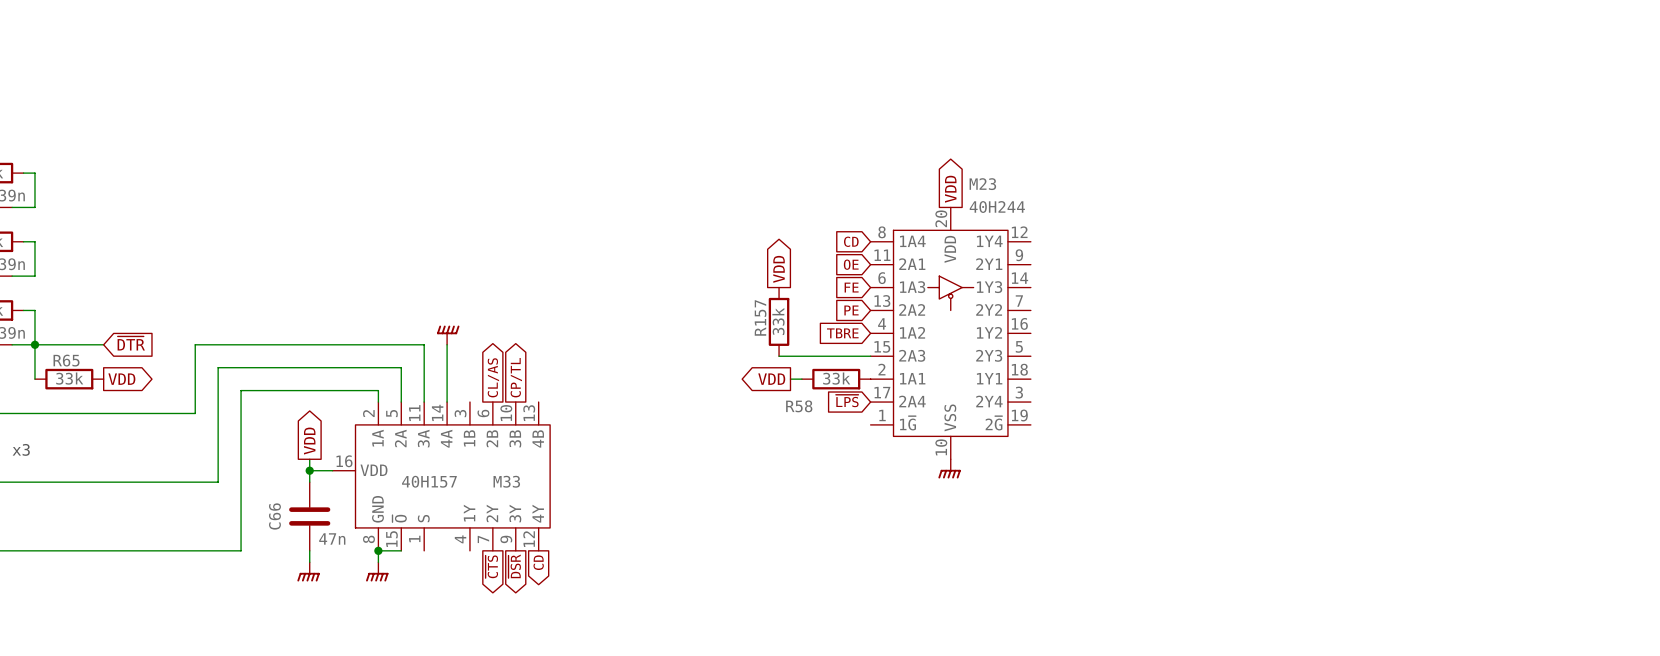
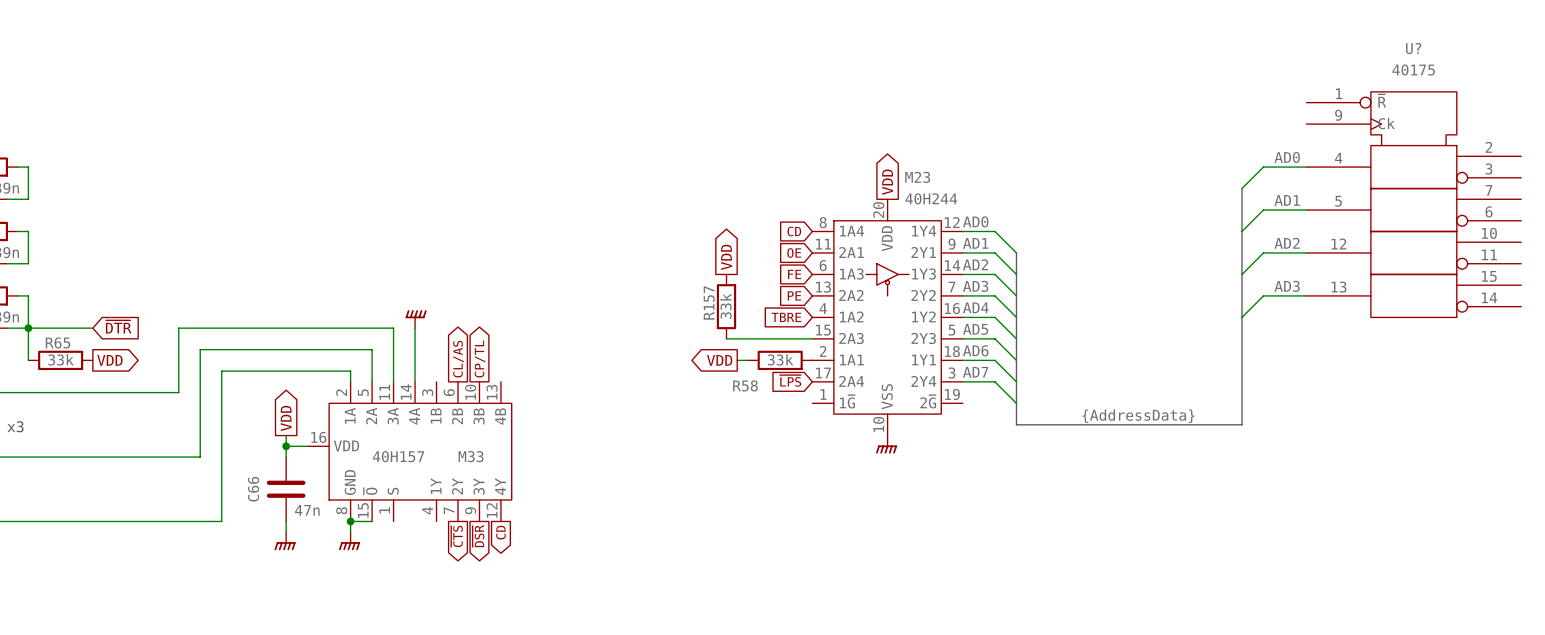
label: none -> AD0 (1287, 157)
wire: none -> (1306, 167) (1263, 167) (1242, 188)
bus: none -> (1242, 188) (1242, 424) (1016, 424) (1016, 252)
label: none -> AD1 (1287, 200)
U?: none -> 40175 (1413, 204)
wire: none -> (1306, 210) (1263, 210) (1242, 231)
label: none -> AD0 (975, 221)
wire: none -> (962, 231) (994, 231) (1016, 252)
label: none -> AD1 (975, 243)
label: none -> AD2 (1287, 243)
wire: none -> (962, 252) (994, 252) (1016, 274)
wire: none -> (1306, 252) (1263, 252) (1242, 274)
label: none -> AD2 (975, 264)
wire: none -> (962, 274) (994, 274) (1016, 295)
label: none -> AD3 (975, 286)
label: none -> AD3 (1287, 286)
wire: none -> (962, 295) (994, 295) (1016, 317)
wire: none -> (1306, 295) (1263, 295) (1242, 317)
label: none -> AD4 (975, 307)
wire: none -> (962, 317) (994, 317) (1016, 338)
label: none -> AD5 (975, 329)
wire: none -> (962, 338) (994, 338) (1016, 360)
label: none -> AD6 (975, 350)
wire: none -> (962, 360) (994, 360) (1016, 381)
label: none -> AD7 (975, 372)
wire: none -> (962, 381) (994, 381) (1016, 403)
label: none -> {AddressData} (1138, 416)

